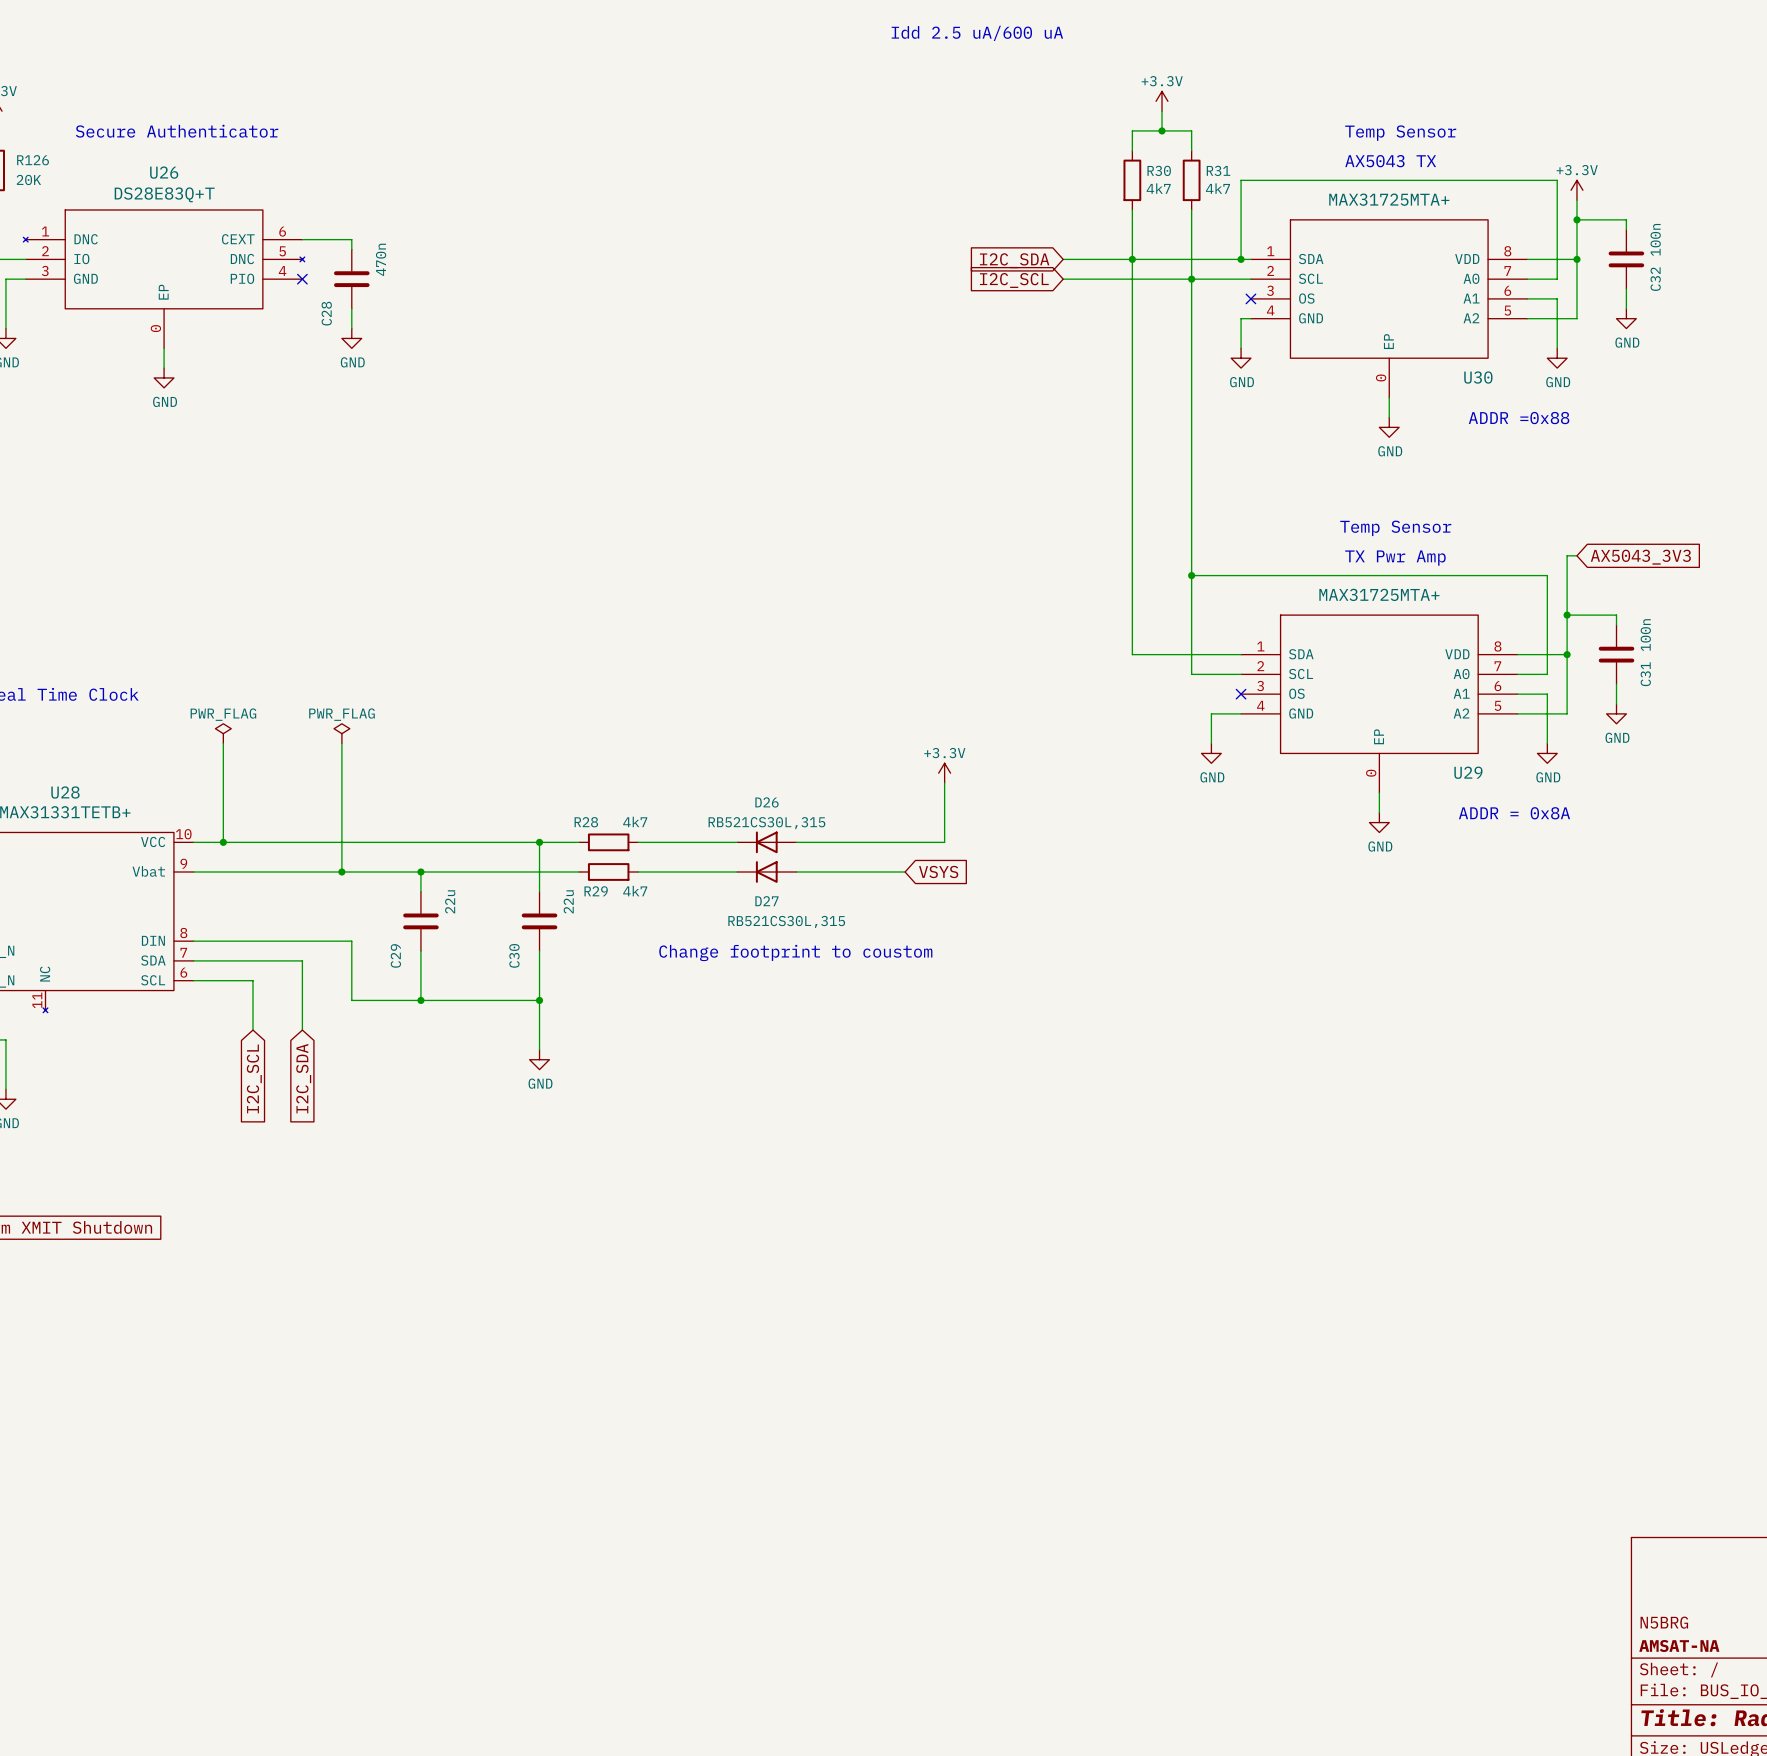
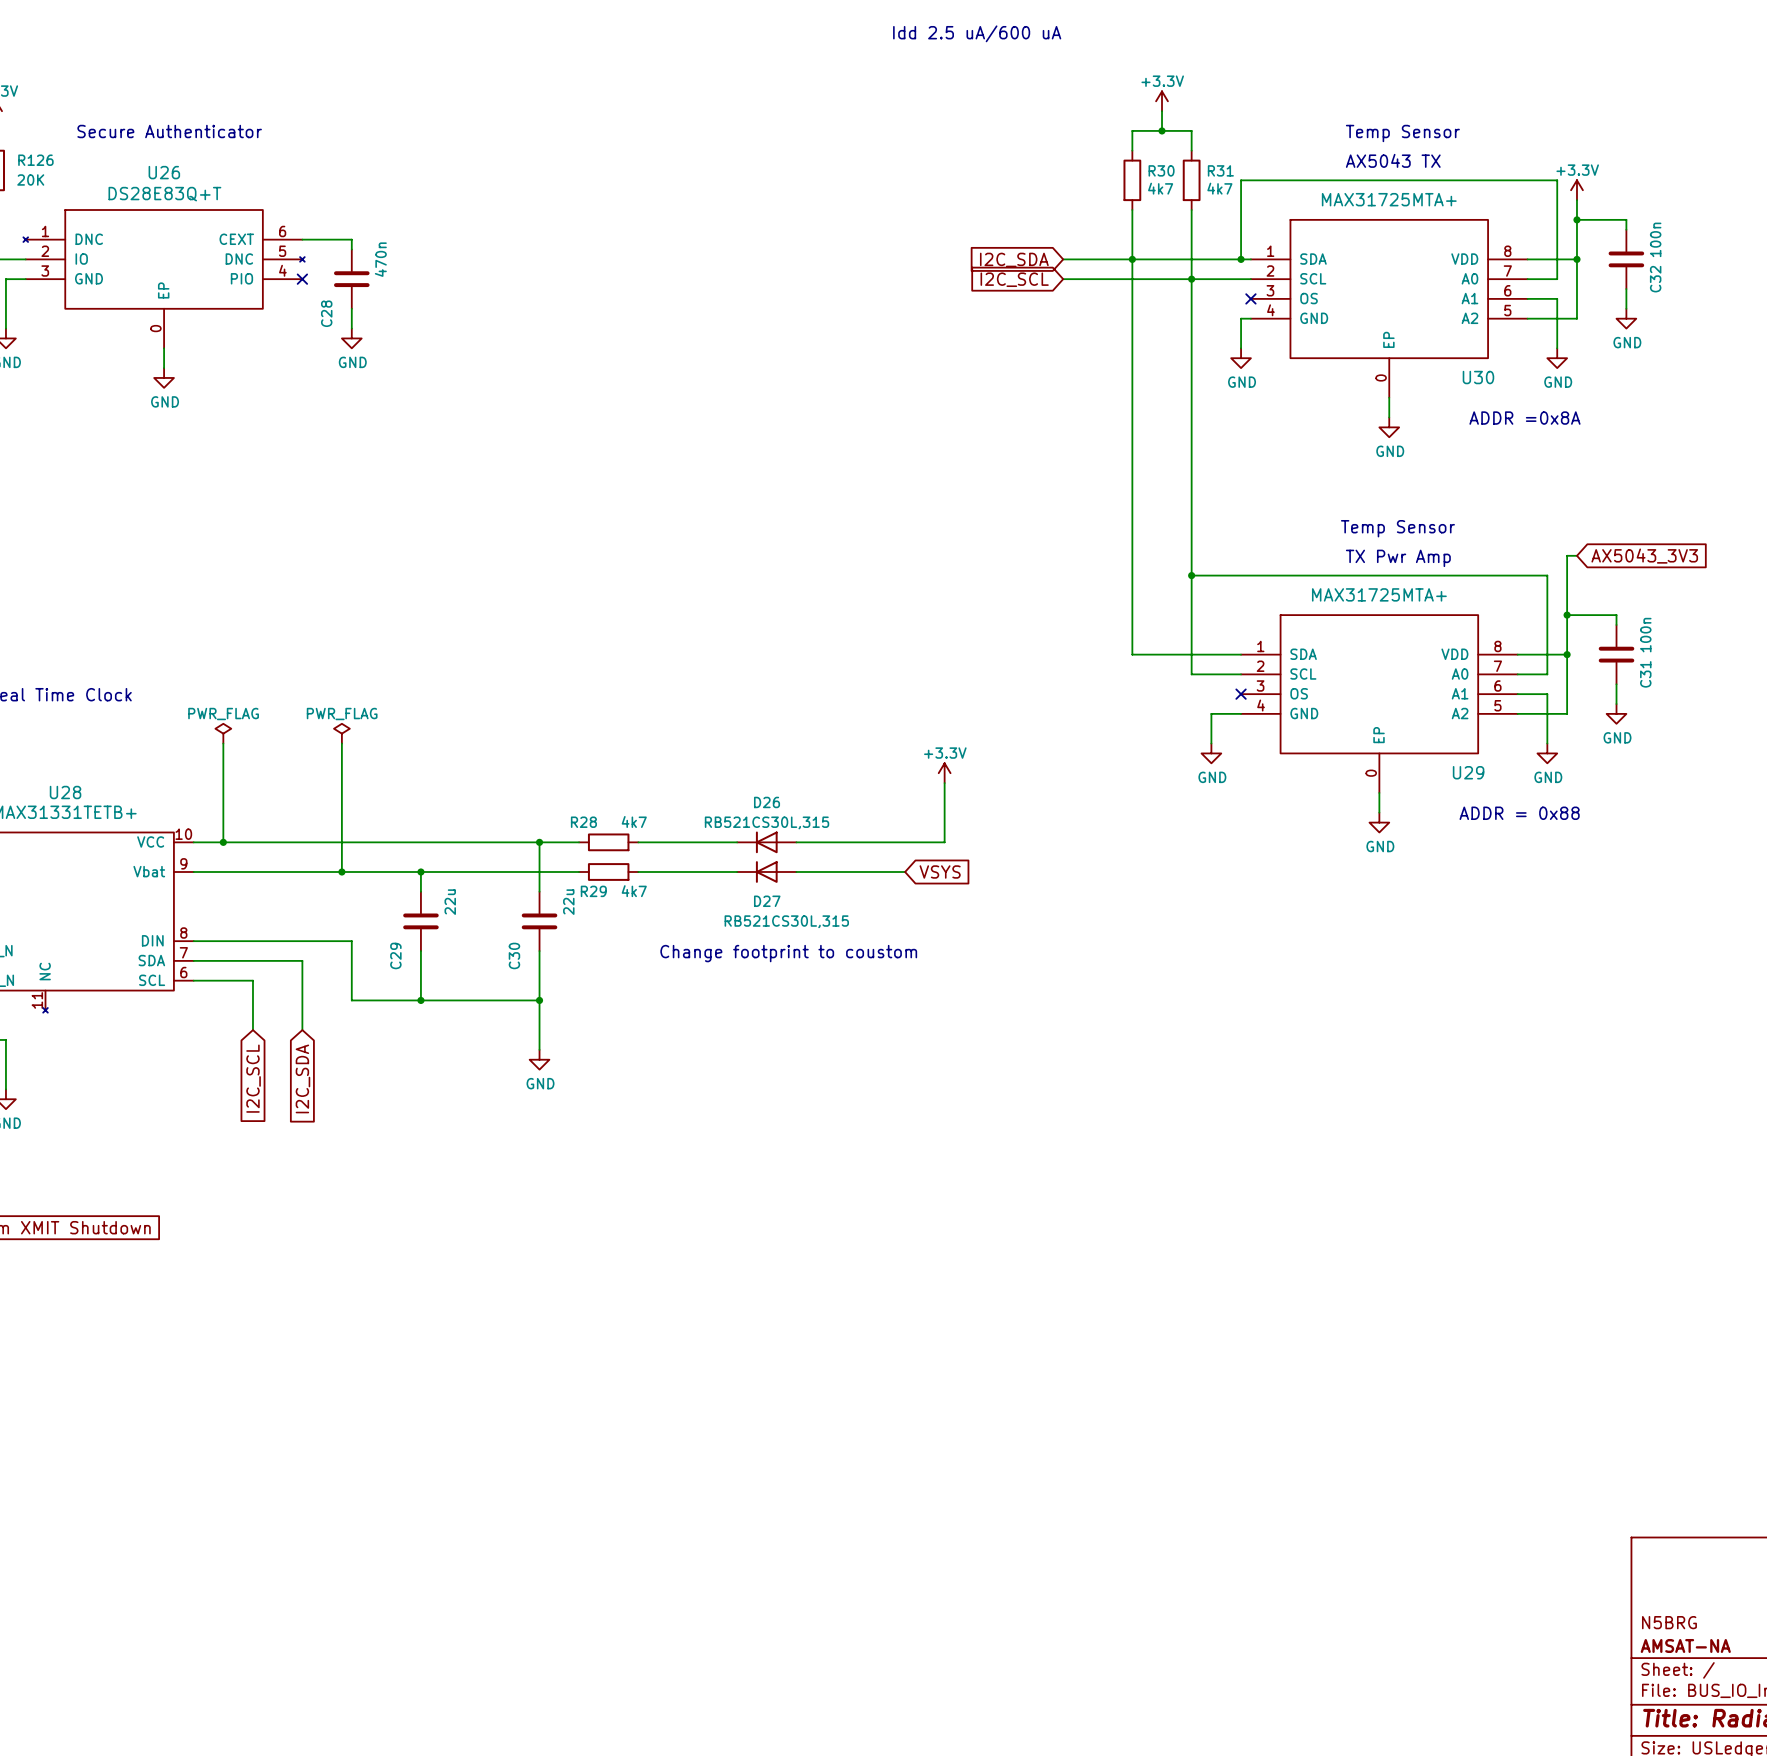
text: ADDR =0x88 (1519, 418) -> ADDR =0x8A (1524, 418)
text: ADDR = 0x8A (1514, 813) -> ADDR = 0x88 (1519, 813)

